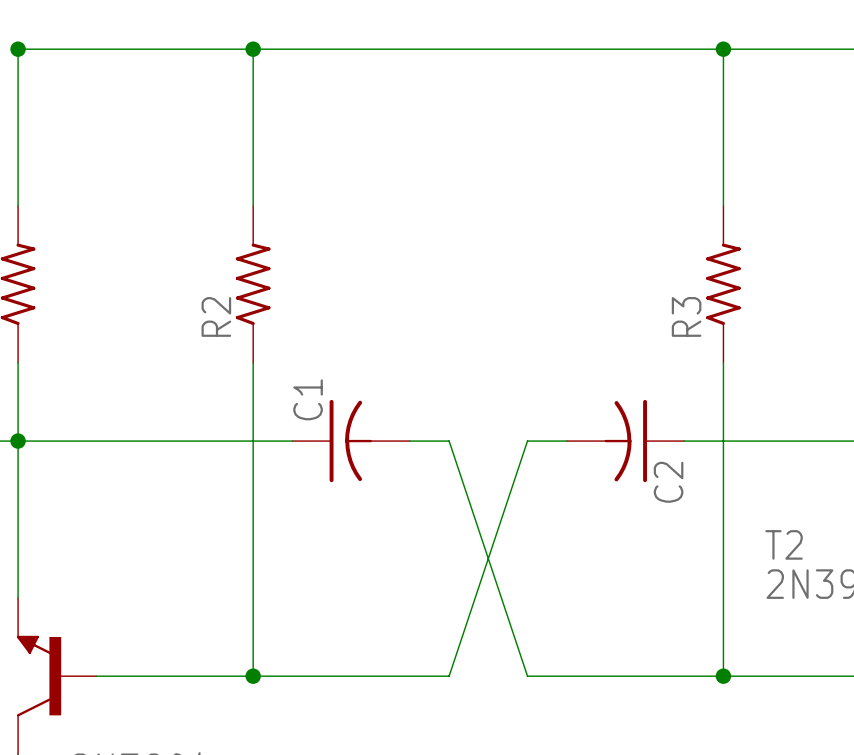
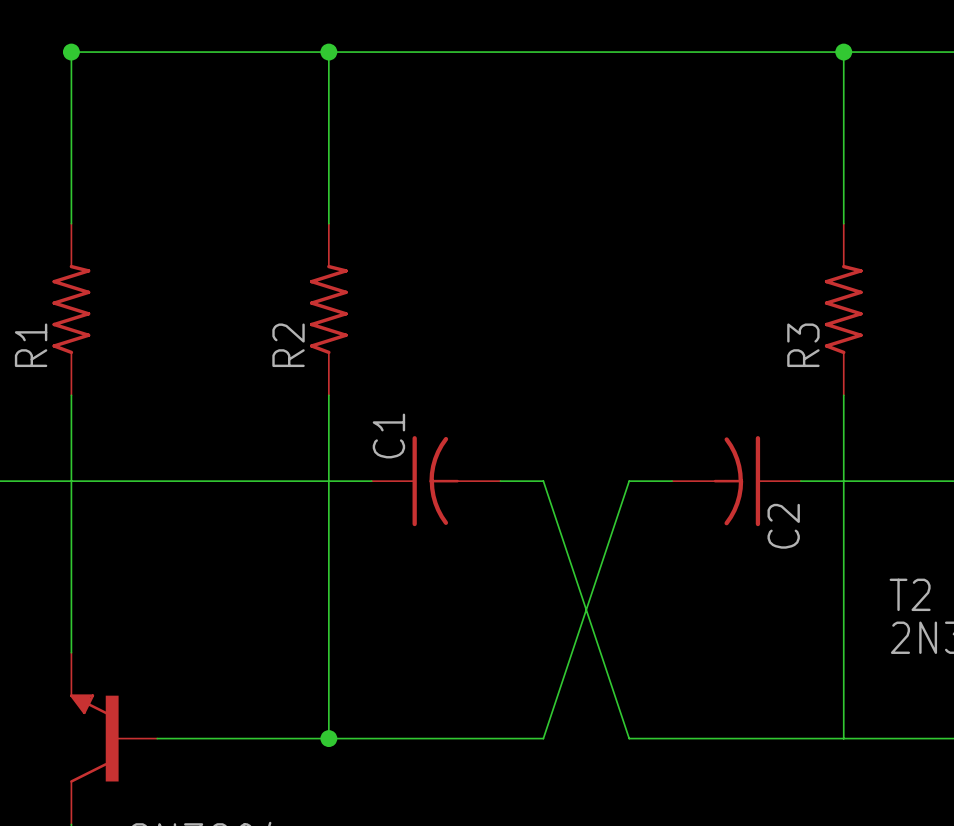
junction: (18, 441) -> none
junction: (723, 676) -> none

